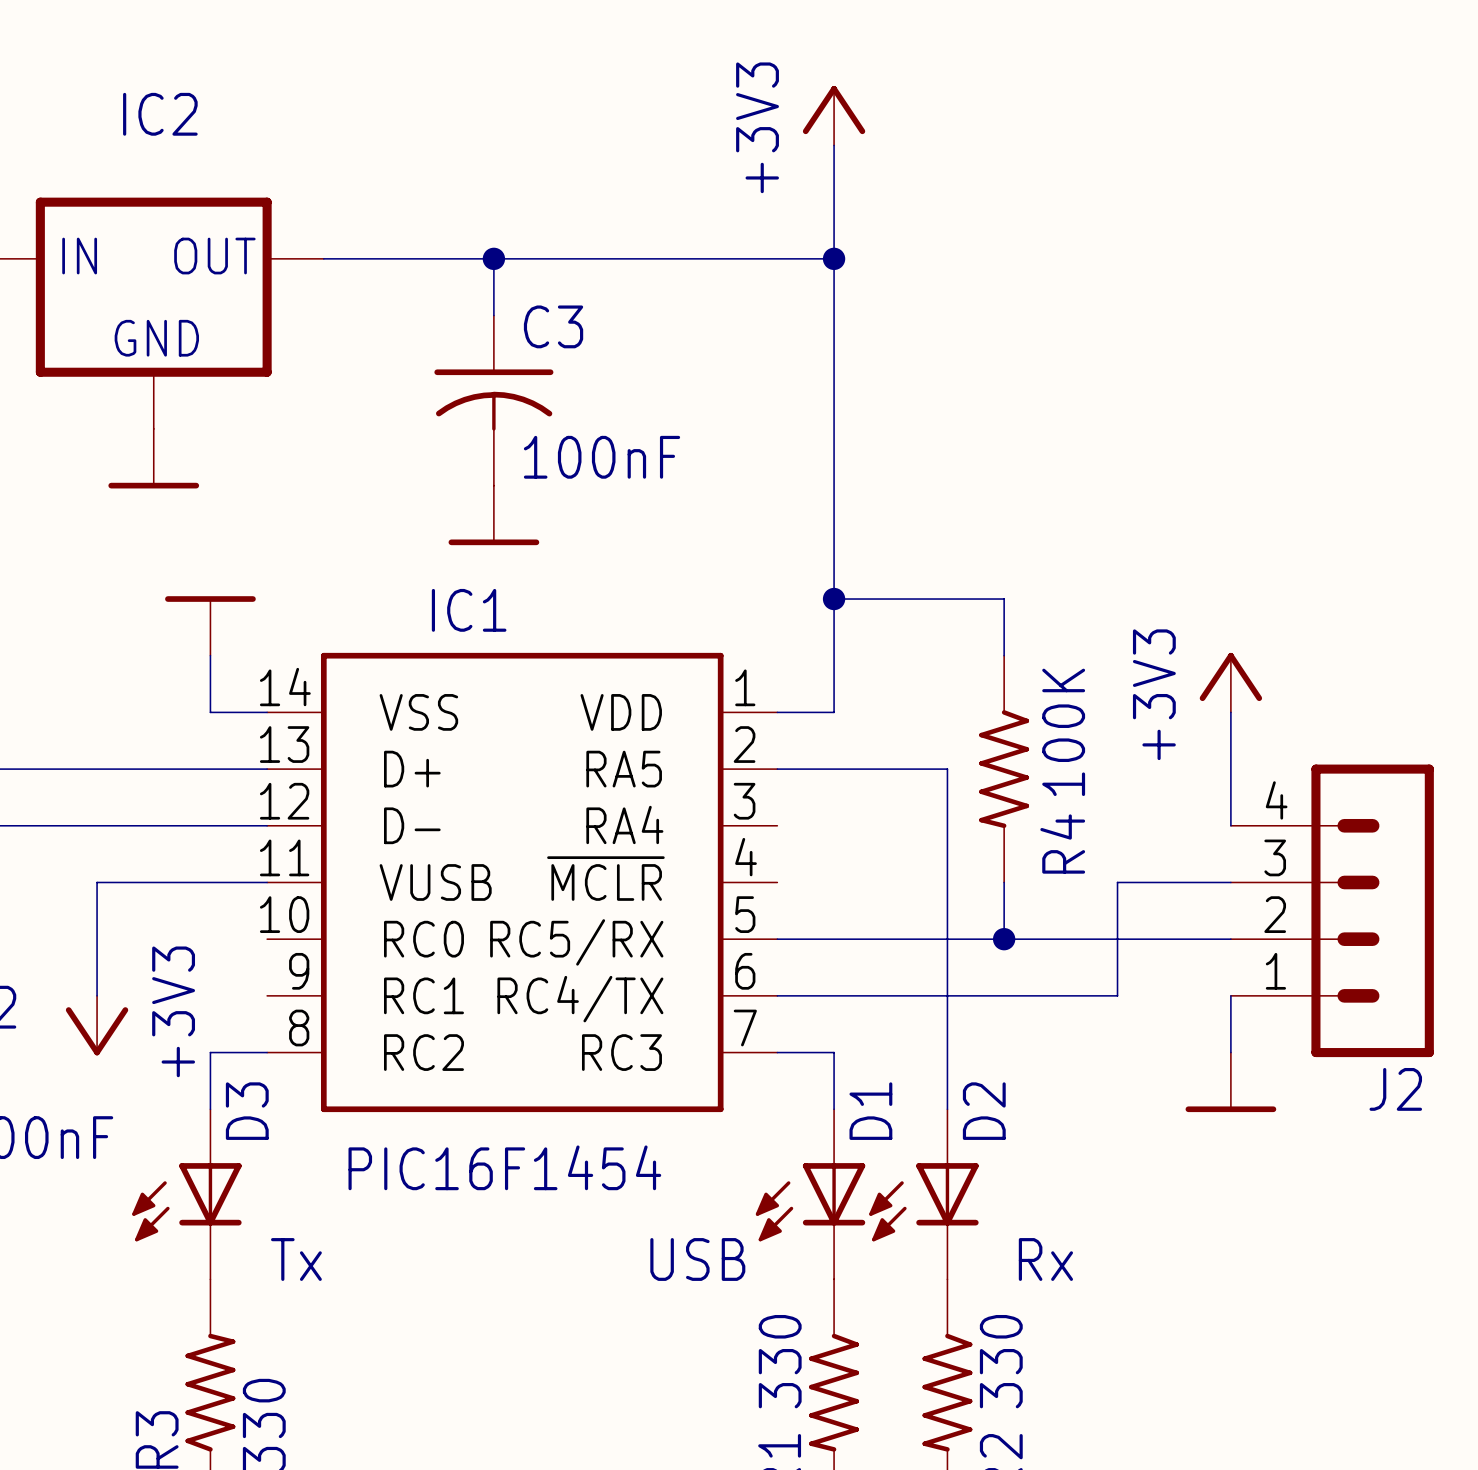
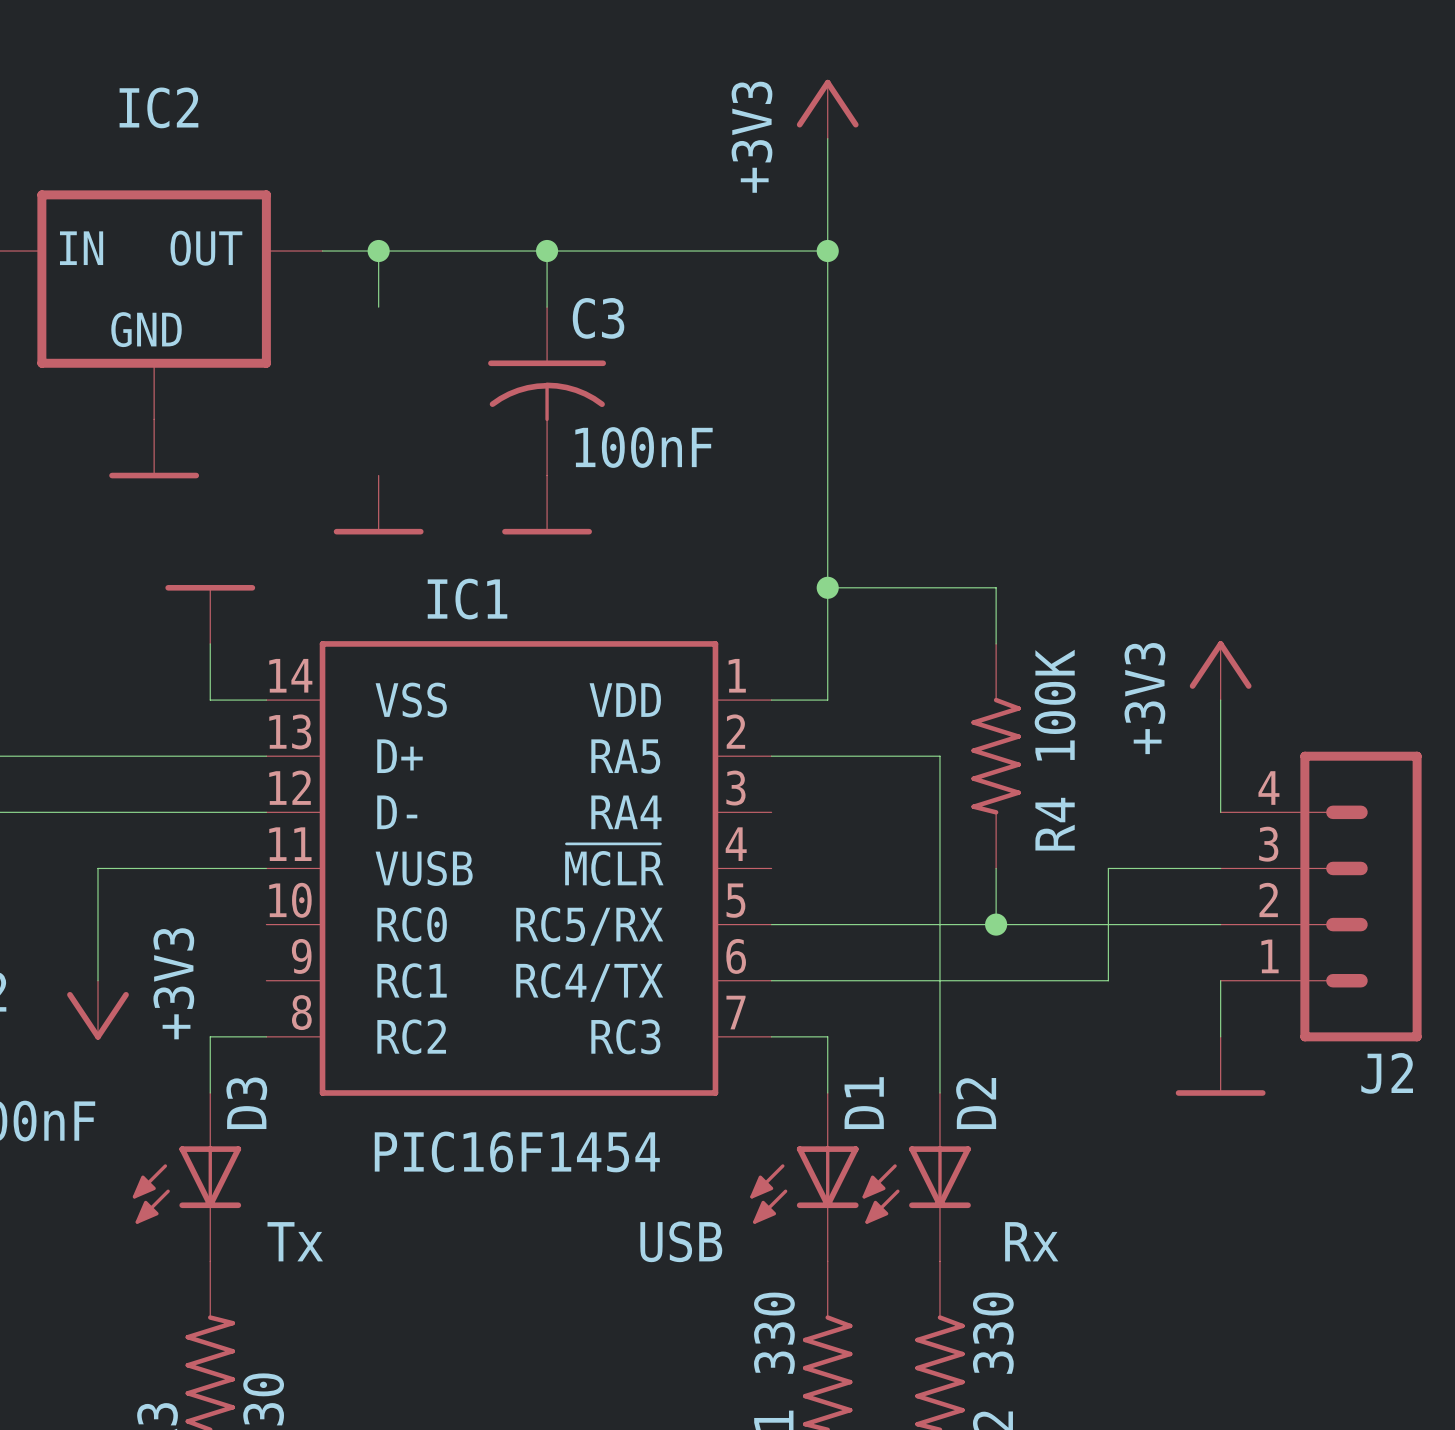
wire: none -> (378, 251) (378, 307)
junction: none -> (378, 251)
wire: (493, 258) (493, 315) -> (547, 251) (547, 307)
junction: (493, 258) -> none
junction: none -> (547, 251)
C3 position: (493, 400) -> (547, 391)
power symbol: none -> (378, 505)
power symbol: (493, 515) -> none
power symbol: none -> (547, 505)

